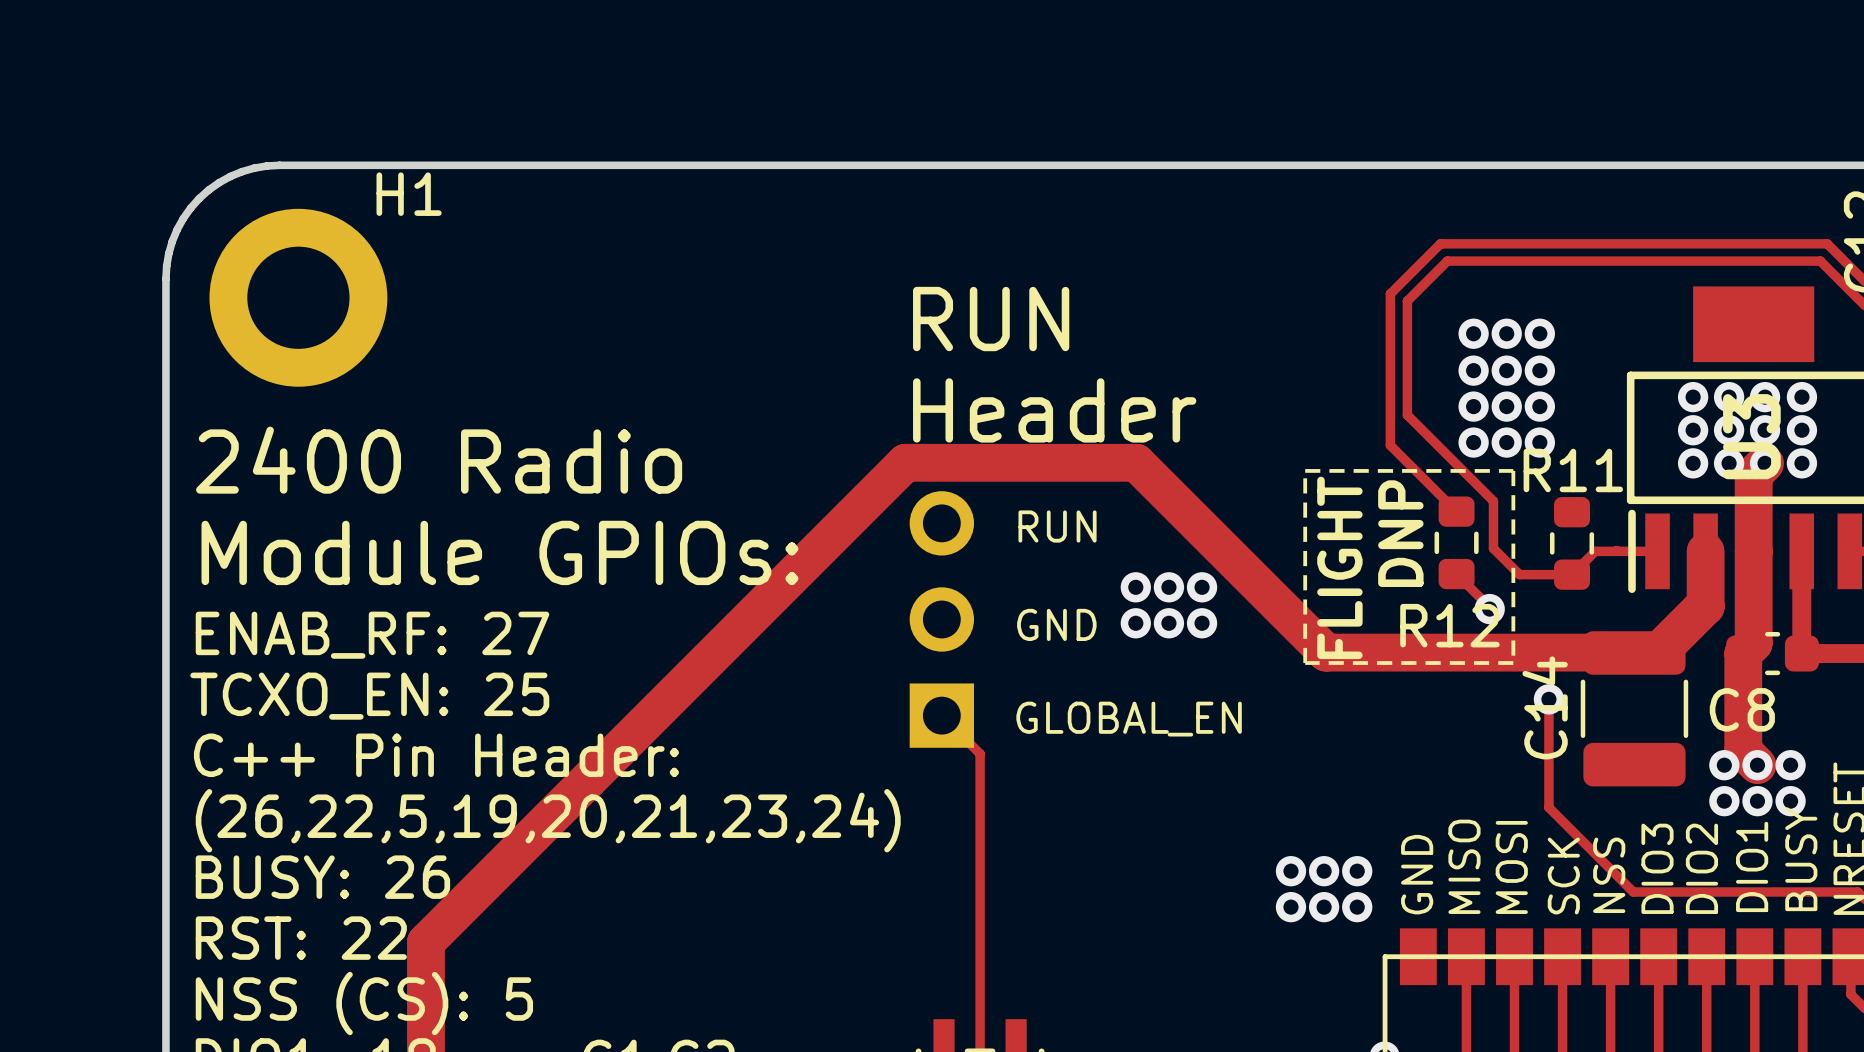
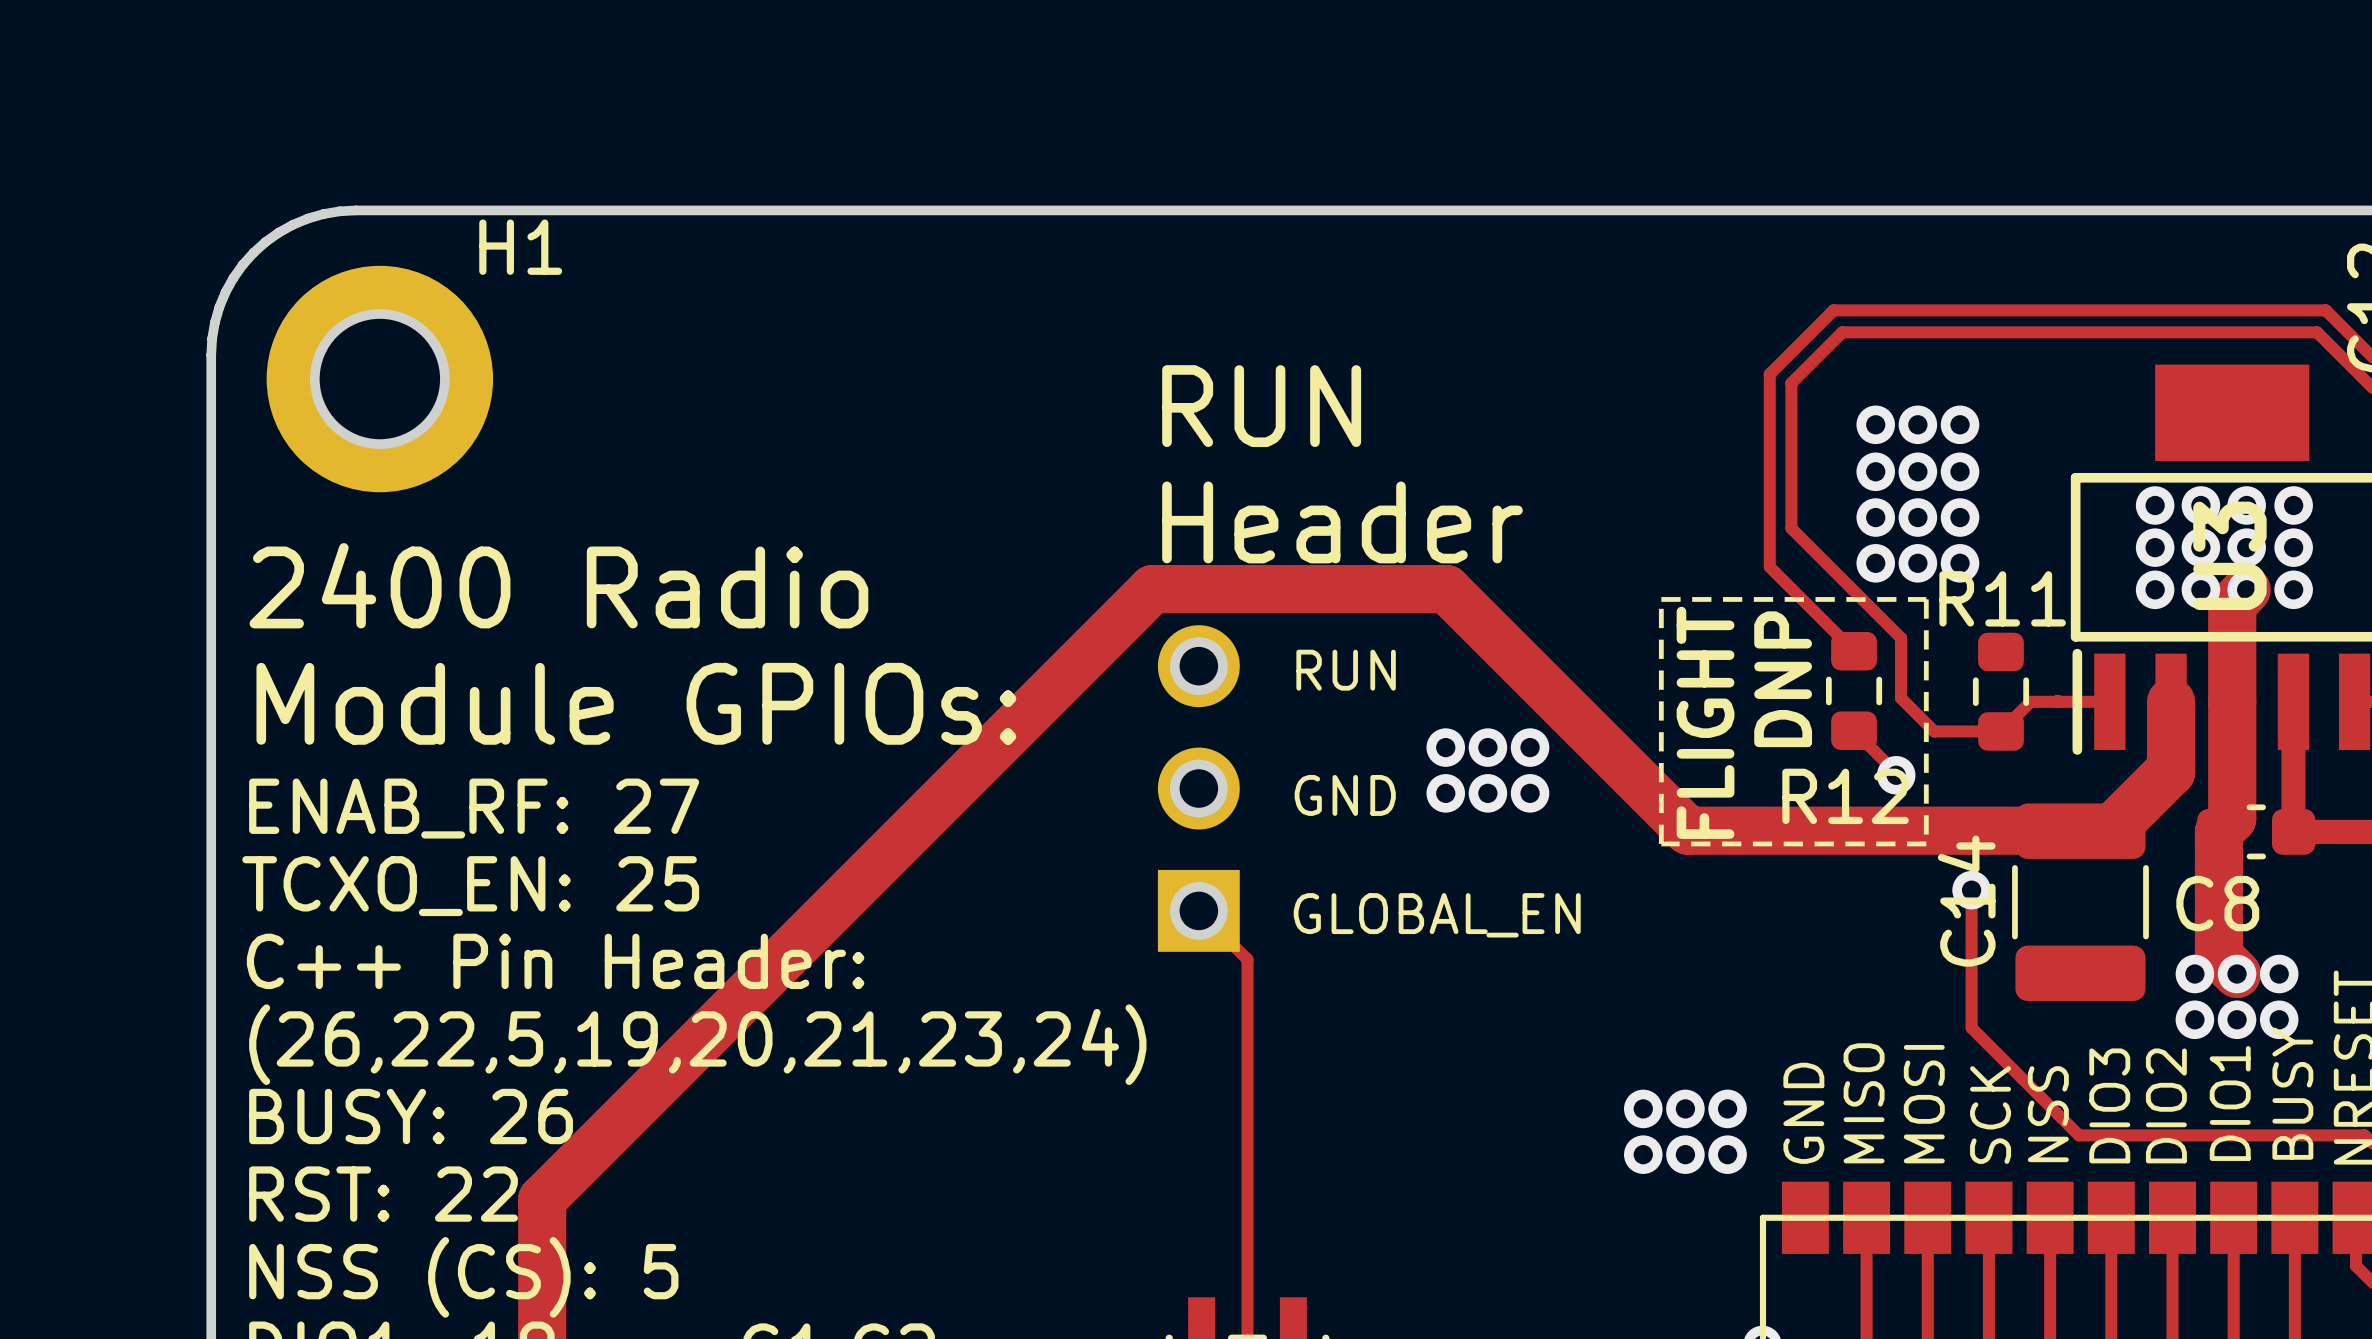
round board edge: none -> [310, 309, 450, 449]
round board edge: none -> [1169, 637, 1228, 696]
round board edge: none -> [1169, 759, 1228, 818]
round board edge: none -> [1169, 881, 1228, 940]

